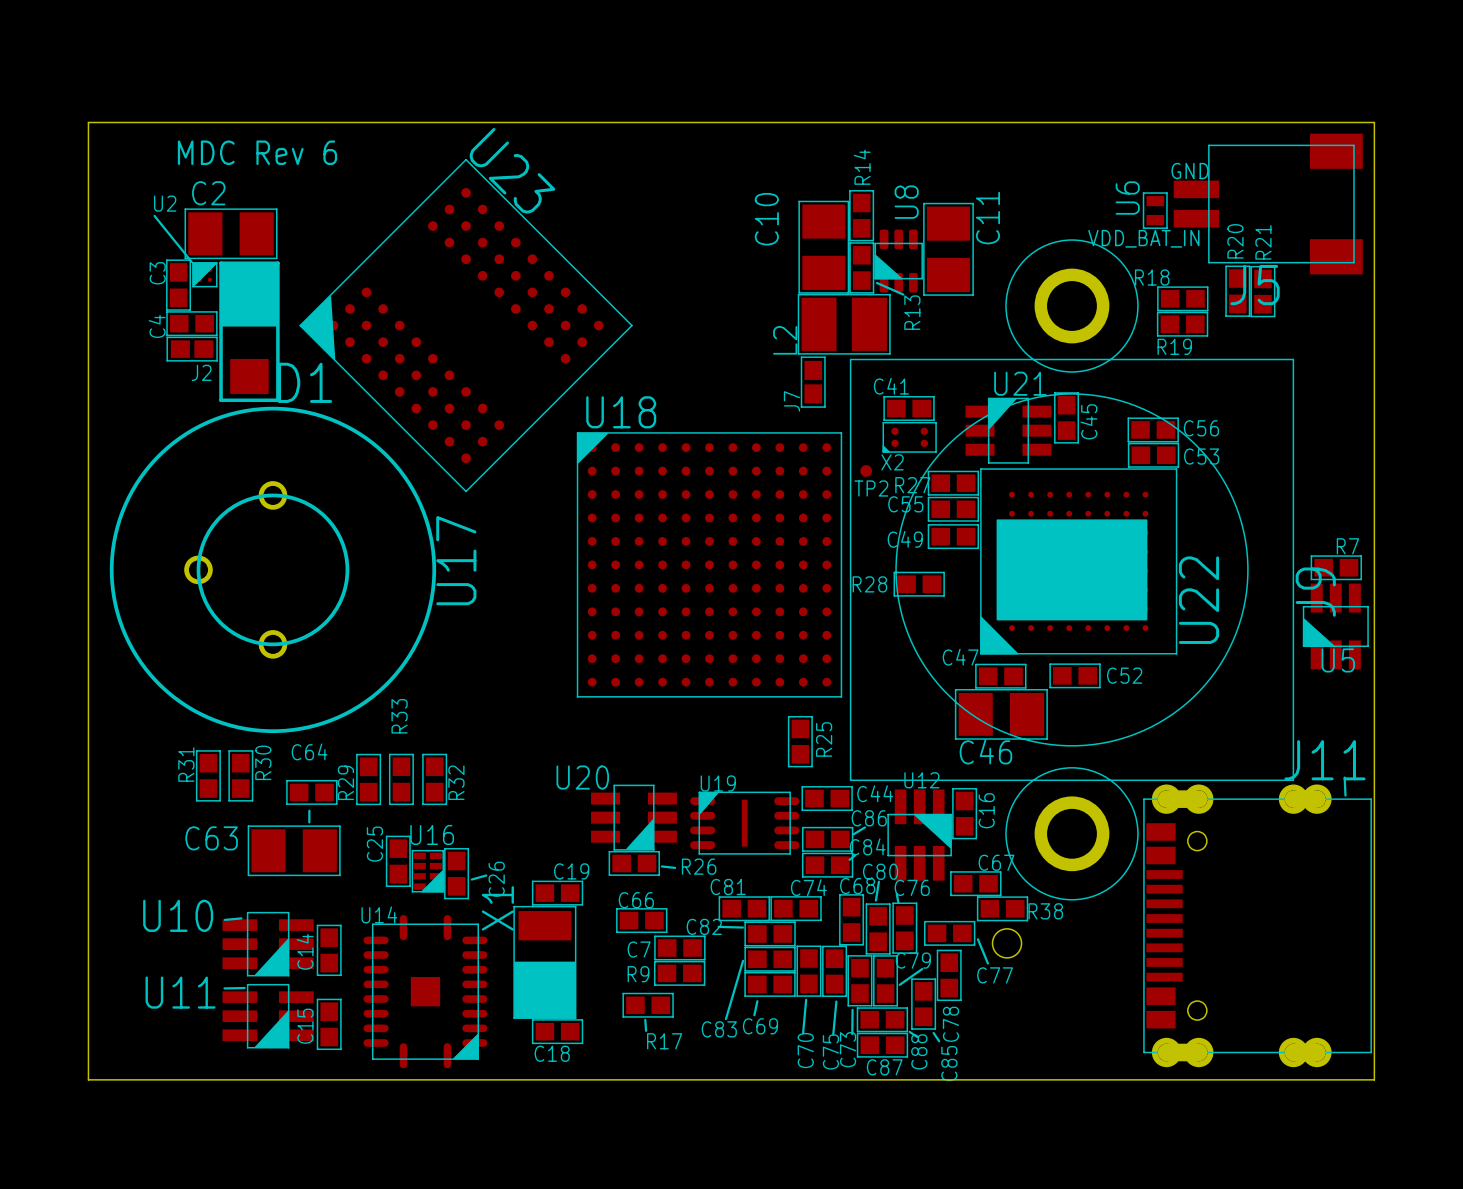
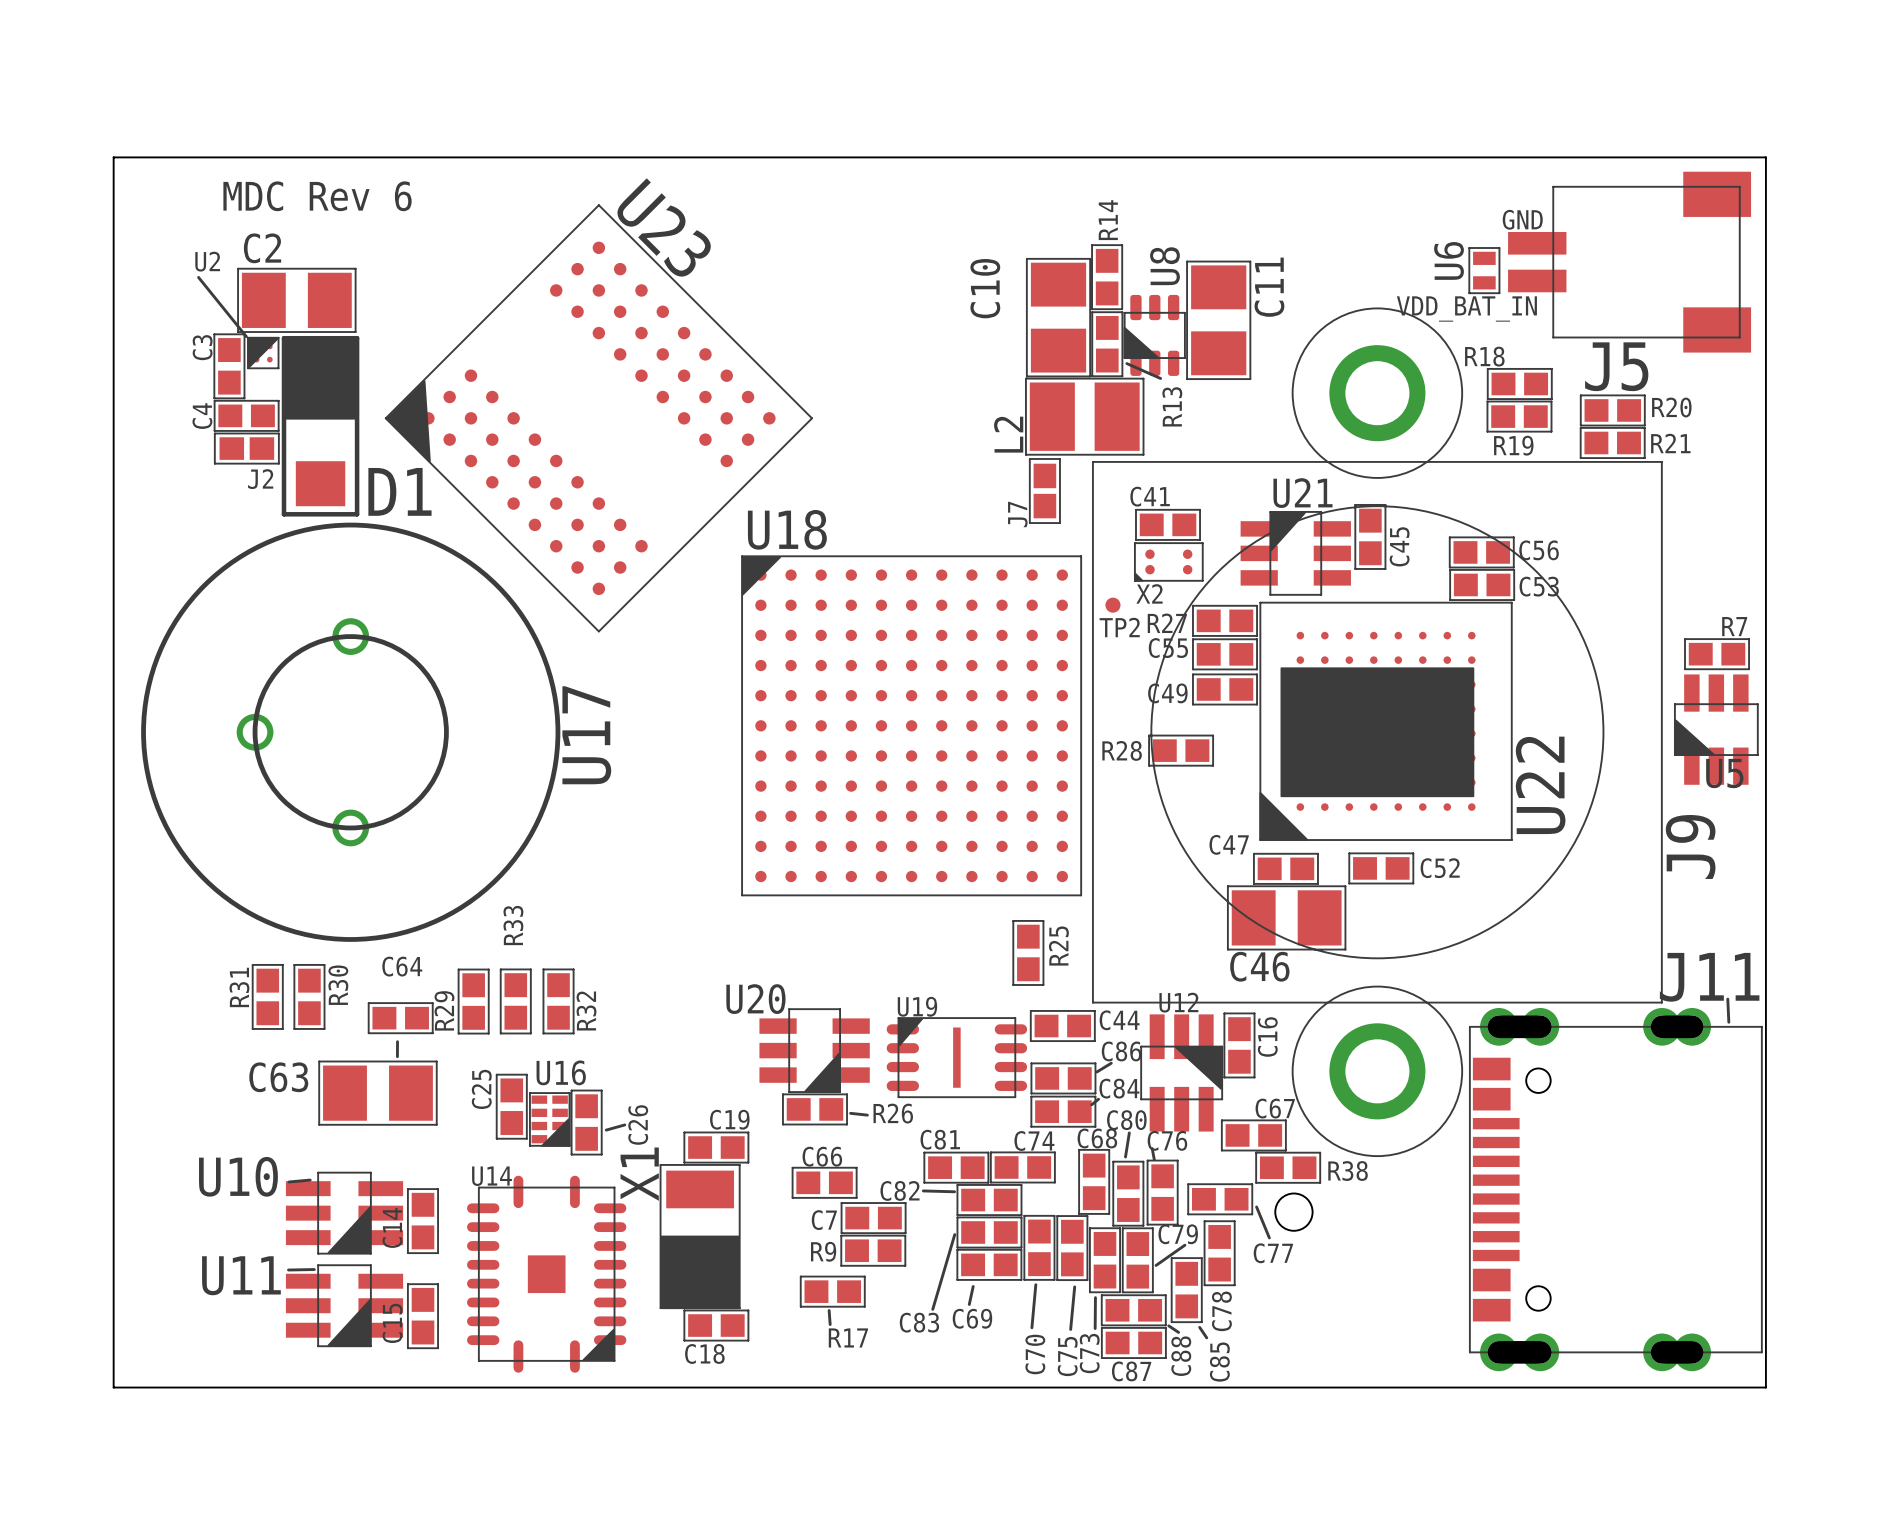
R20 rotation: 0° (1237, 291) -> 90° clockwise (1612, 410)
R20 position: (1237, 291) -> (1612, 410)
R21 rotation: 0° (1262, 291) -> 90° clockwise (1612, 442)
R21 position: (1262, 291) -> (1612, 442)
R7 position: (1336, 567) -> (1717, 654)
J9 name position: J9 (1315, 592) -> J9 (1690, 846)
U5 position: (1335, 626) -> (1716, 729)

